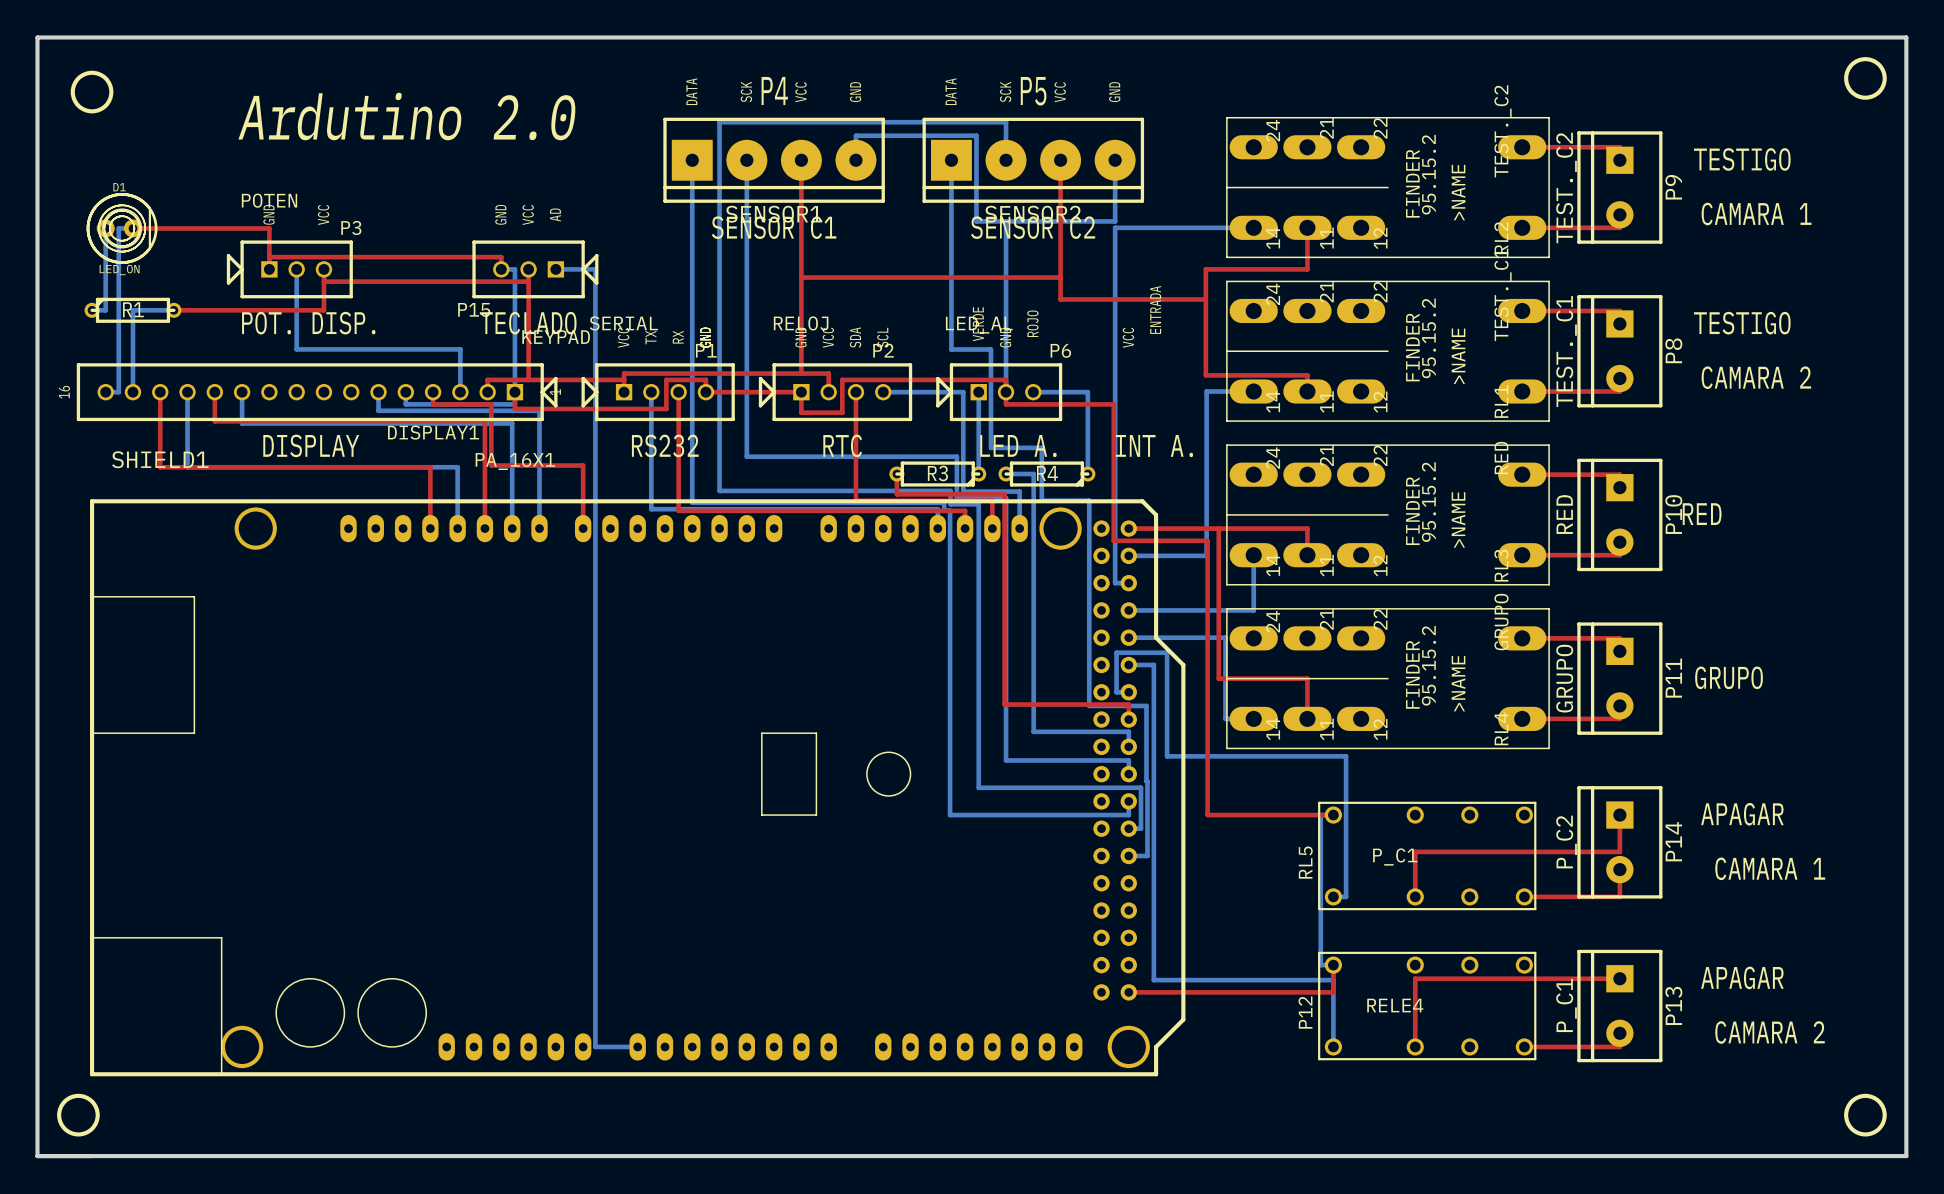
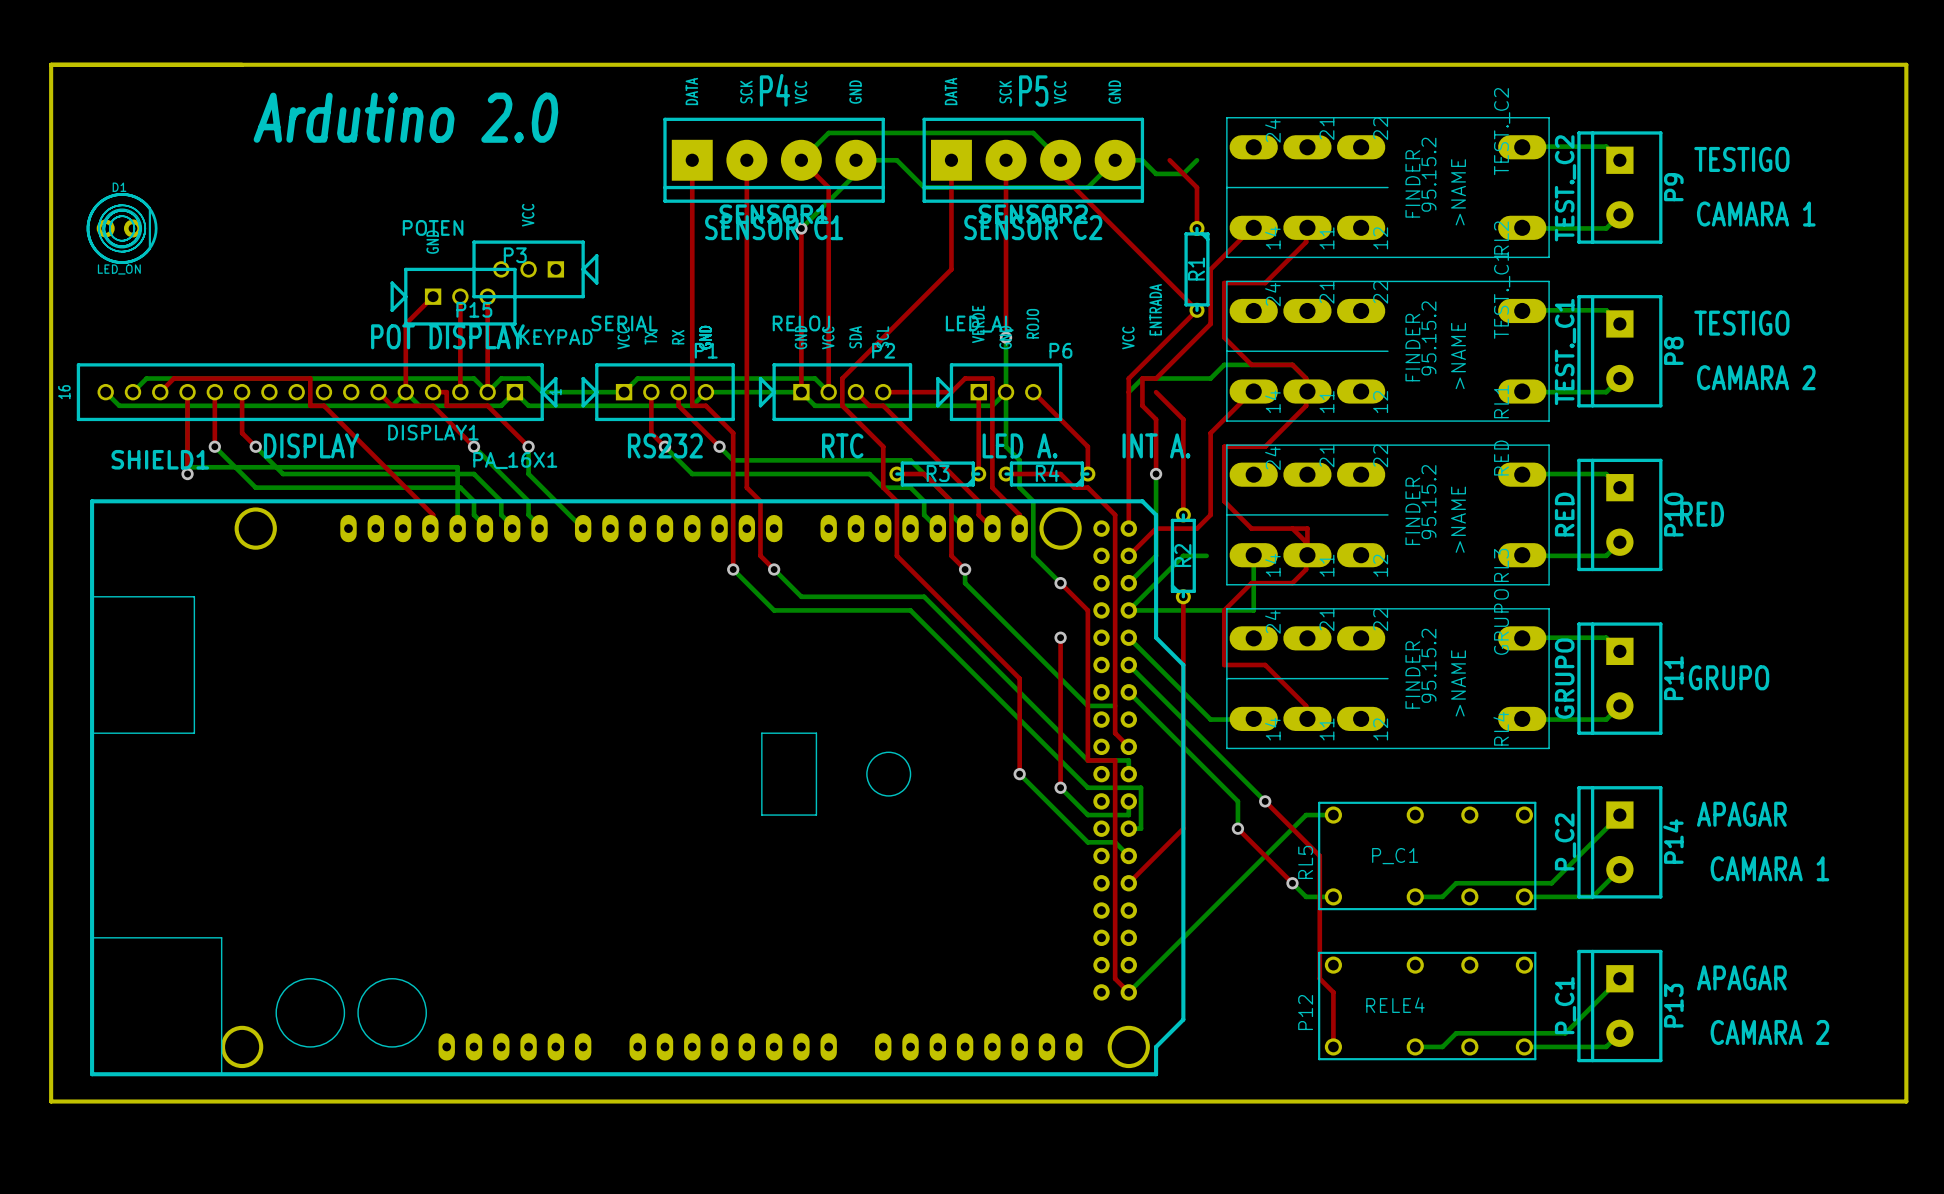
drawing: [1844, 57, 1887, 100] -> none
board edge: (1906, 64) (1906, 37) (37, 37) (37, 1156) (1906, 1156) (1906, 1101) -> (1906, 64) (51, 64) (51, 1101) (1906, 1101)
drawing: [70, 70, 114, 114] -> none
bottom track: none -> (1522, 147) (1606, 146) (1619, 160)
top track: (1522, 147) (1619, 147) (1619, 160) -> none
bottom track: (692, 160) (692, 502) (944, 502) (944, 510) (950, 510) (950, 815) (1087, 815) -> (1060, 787) (1087, 815)
top track: none -> (692, 160) (692, 405) (705, 405) (733, 433) (733, 569)
bottom track: (746, 160) (746, 456) (956, 456) (956, 497) (1006, 497) (1006, 760) (1087, 760) -> (774, 569) (801, 596) (924, 596) (1087, 760)
top track: none -> (746, 160) (746, 487) (760, 501) (760, 555) (774, 569)
bottom track: none -> (801, 160) (828, 132) (1033, 132) (1060, 160)
top track: (801, 160) (801, 228) -> (801, 160) (828, 187) (828, 373)
bottom track: (855, 160) (855, 135) (976, 135) (976, 221) (1115, 221) (1115, 160) -> none
bottom track: (951, 160) (951, 349) (990, 349) (990, 447) (1041, 447) (1041, 500) (1089, 500) (1089, 705) -> (965, 569) (965, 583) (1089, 705)
bottom track: (1006, 160) (1006, 122) (719, 122) (719, 490) (950, 490) (950, 504) (978, 504) (978, 787) (1087, 787) -> (733, 569) (774, 610) (910, 610) (1087, 787)
top track: none -> (1006, 160) (1006, 337)
top track: none -> (1169, 160) (1197, 187) (1197, 228)
bottom track: none -> (1197, 160) (1183, 173) (1156, 173) (1142, 160) (1115, 160) (1087, 187) (924, 187) (896, 160) (855, 160) (855, 173) (801, 228)
top track: (1060, 173) (1060, 299) (1205, 299) -> (1060, 173) (1197, 310) (1128, 378) (1128, 528)
text: GND (268, 214) -> none
text: VCC (323, 214) -> none
text position: GND (500, 214) -> GND (432, 242)
text: AD (555, 214) -> none
bottom track: none -> (1619, 214) (1606, 228) (1522, 227)
top track: (1619, 214) (1619, 227) (1522, 227) -> none
bottom track: (1006, 221) (1006, 337) -> none
bottom track: (1253, 227) (1115, 227) (1115, 583) (1128, 583) -> (1156, 474) (1156, 555) (1128, 583)
top track: none -> (1253, 227) (1210, 269) (1210, 323) (1156, 378) (1142, 378) (1142, 405) (1156, 419) (1156, 474)
top track: (1307, 227) (1307, 269) (1205, 269) (1205, 375) (1307, 375) (1307, 391) -> (1307, 227) (1306, 242) (1265, 283) (1224, 283) (1224, 337) (1251, 364) (1292, 364) (1306, 378) (1306, 405) (1265, 446) (1224, 446) (1224, 501) (1251, 528)
bottom track: (105, 228) (105, 310) (92, 310) -> none
bottom track: (132, 228) (118, 228) (118, 392) (105, 392) -> (1060, 583) (1033, 555) (1033, 501) (1019, 487) (1019, 460) (1006, 446) (1006, 392) (992, 405) (815, 405) (801, 392) (705, 392) (692, 405) (528, 405) (514, 392) (501, 405) (419, 405) (405, 392) (392, 405) (119, 405) (105, 392)
top track: (132, 228) (269, 228) (269, 269) -> none
via: none -> (801, 228)
top track: (269, 257) (501, 257) (501, 269) -> none
P3 position: (289, 269) -> (453, 296)
bottom track: (296, 269) (296, 349) (460, 349) (460, 392) -> none
top track: (323, 269) (323, 310) (173, 310) -> none
bottom track: (501, 269) (514, 269) (514, 404) (405, 404) (405, 392) -> none
top track: (528, 269) (528, 379) -> none
bottom track: (555, 269) (595, 269) (595, 1046) (637, 1046) -> none
top track: (801, 277) (1060, 277) -> none
top track: (323, 281) (528, 281) -> none
top track: none -> (433, 296) (405, 323) (405, 392)
top track: none -> (460, 296) (460, 392)
R1 rotation: 0° (132, 310) -> 90° clockwise (1197, 269)
R1 position: (132, 310) -> (1197, 269)
bottom track: (173, 310) (132, 310) (132, 392) -> (828, 392) (815, 378) (637, 378) (624, 392) (542, 392) (528, 378) (501, 378) (487, 392) (474, 378) (146, 378) (132, 392)
bottom track: none -> (1522, 310) (1606, 310) (1619, 323)
top track: (1522, 310) (1619, 310) (1619, 323) -> none
text: POT. DISP. (308, 323) -> POT DISPLAY (447, 336)
text: TECLADO (528, 323) -> none
via: none -> (1006, 337)
top track: none -> (801, 373) (801, 392)
top track: (828, 373) (624, 373) (624, 392) -> none
bottom track: none -> (1619, 378) (1606, 392) (1522, 391)
top track: (1619, 378) (1619, 391) (1522, 391) -> none
top track: (487, 379) (624, 379) -> (487, 379) (487, 296)
top track: (842, 379) (1006, 379) (1006, 404) (1113, 404) (1113, 540) (1207, 540) (1207, 815) (1333, 815) -> (842, 379) (951, 269) (951, 160)
bottom track: (1253, 391) (1206, 391) (1206, 555) -> none
bottom track: none -> (1307, 391) (1306, 378) (1292, 364) (1224, 364) (1210, 378) (1142, 378) (1128, 392)
top track: (160, 392) (160, 467) (430, 467) (430, 528) -> (160, 392) (173, 378) (310, 378) (310, 405) (323, 405) (433, 514) (433, 528) (430, 528)
top track: none -> (187, 392) (187, 474)
bottom track: (242, 392) (242, 423) (512, 423) (512, 528) -> (255, 446) (283, 474) (474, 474) (501, 501) (501, 514) (514, 528) (512, 528)
top track: none -> (242, 392) (242, 433) (255, 446)
bottom track: (378, 392) (378, 410) (539, 410) (539, 528) -> (474, 446) (528, 501) (528, 514) (542, 528) (539, 528)
top track: none -> (378, 392) (392, 405) (433, 405) (474, 446)
top track: (433, 392) (433, 404) (491, 404) (491, 465) (583, 465) (583, 528) -> (433, 392) (446, 392) (446, 405) (487, 405) (528, 446)
top track: (514, 392) (514, 408) (666, 408) (666, 379) (705, 379) (705, 392) (801, 392) (801, 412) (842, 412) (842, 405) -> (1019, 774) (1019, 678) (896, 555) (896, 501) (883, 487) (883, 446) (842, 405)
bottom track: (651, 392) (651, 509) (937, 509) (937, 528) -> (664, 446) (692, 474) (869, 474) (883, 487) (910, 487) (924, 501) (924, 514) (937, 528)
top track: none -> (651, 392) (651, 433) (664, 446)
top track: (855, 392) (855, 500) (992, 500) (992, 528) -> (855, 392) (869, 405) (883, 405) (978, 501) (978, 514) (992, 528)
bottom track: (883, 392) (963, 392) (963, 491) (1019, 491) (1019, 528) -> none
top track: none -> (883, 392) (951, 392) (965, 378) (992, 378) (992, 487) (1019, 514) (1019, 528)
bottom track: (978, 392) (978, 474) -> none
top track: none -> (978, 392) (978, 474)
bottom track: (1033, 392) (1087, 392) (1087, 474) -> none
top track: none -> (1033, 392) (1087, 446) (1087, 474)
top track: none -> (1156, 392) (1183, 419) (1183, 514)
top track: (678, 405) (678, 510) (965, 510) (965, 528) -> (678, 405) (719, 446)
top track: (214, 421) (484, 421) (484, 528) -> (214, 421) (214, 446)
bottom track: none -> (214, 446) (255, 487) (460, 487) (474, 501) (474, 514) (487, 528) (484, 528)
via: none -> (214, 446)
via: none -> (255, 446)
via: none -> (474, 446)
bottom track: none -> (528, 446) (528, 474) (583, 528)
via: none -> (528, 446)
via: none -> (664, 446)
bottom track: none -> (719, 446) (733, 460) (910, 460) (951, 501) (951, 514) (965, 528)
via: none -> (719, 446)
via: none -> (187, 474)
top track: (896, 474) (896, 494) (1004, 494) (1004, 704) (1128, 704) (1128, 719) -> (896, 474) (924, 474) (951, 501) (951, 555) (965, 569)
bottom track: (1006, 474) (1033, 474) (1033, 731) (1128, 731) (1128, 746) -> none
top track: none -> (1006, 474) (1060, 474) (1074, 487) (1087, 487) (1115, 514) (1115, 733) (1128, 746)
via: none -> (1156, 474)
bottom track: none -> (1522, 474) (1606, 474) (1619, 487)
top track: (1522, 474) (1619, 474) (1619, 487) -> none
top track: (1128, 528) (1156, 528) -> (1128, 555) (1156, 528)
top track: (1197, 528) (1251, 528) -> (1197, 528) (1210, 514) (1210, 433) (1253, 391)
top track: (1218, 528) (1218, 678) (1307, 678) (1307, 718) -> (1292, 528) (1306, 542) (1306, 569) (1292, 583) (1251, 583) (1224, 610) (1224, 664) (1265, 664) (1306, 705) (1307, 718)
bottom track: none -> (1619, 542) (1606, 555) (1522, 555)
top track: (1619, 542) (1619, 555) (1522, 555) -> none
bottom track: (1128, 555) (1183, 555) -> (1128, 610) (1183, 555)
R2: none -> (1183, 555)
via: none -> (733, 569)
via: none -> (774, 569)
via: none -> (965, 569)
via: none -> (1060, 583)
top track: none -> (1183, 596) (1183, 828) (1128, 883)
top track: none -> (1060, 637) (1060, 787)
via: none -> (1060, 637)
bottom track: (1128, 637) (1225, 637) (1225, 718) (1253, 718) -> (1128, 637) (1210, 719) (1253, 718)
bottom track: none -> (1522, 638) (1606, 637) (1619, 651)
top track: (1522, 638) (1619, 638) (1619, 651) -> none
bottom track: (1128, 664) (1153, 664) (1153, 980) (1333, 980) (1333, 1046) -> (1128, 664) (1265, 801)
bottom track: (1128, 692) (1116, 692) (1116, 652) (1167, 652) (1167, 756) (1346, 756) (1346, 896) (1333, 896) -> (1128, 692) (1237, 801) (1237, 828)
bottom track: (1115, 705) (1146, 705) (1147, 855) (1128, 855) -> (1019, 774) (1087, 842) (1115, 842) (1128, 855)
bottom track: none -> (1619, 705) (1606, 719) (1522, 718)
top track: (1619, 705) (1619, 718) (1522, 718) -> none
via: none -> (1019, 774)
via: none -> (1060, 787)
top track: none -> (1265, 801) (1319, 855) (1319, 978) (1333, 992) (1333, 1046)
via: none -> (1265, 801)
bottom track: (1320, 815) (1320, 965) (1333, 965) -> (1320, 815) (1306, 815) (1128, 992)
bottom track: none -> (1619, 815) (1551, 883) (1456, 883) (1442, 896) (1415, 896)
top track: (1619, 815) (1619, 851) (1415, 851) (1415, 896) -> none
top track: none -> (1237, 828) (1292, 883)
via: none -> (1237, 828)
bottom track: none -> (1619, 869) (1592, 896) (1524, 896)
top track: (1619, 869) (1619, 896) (1524, 896) -> none
bottom track: none -> (1292, 883) (1306, 896) (1333, 896)
via: none -> (1292, 883)
top track: (1333, 965) (1333, 992) (1128, 992) -> (1060, 583) (1087, 610) (1087, 760) (1115, 760) (1115, 978) (1128, 992)
bottom track: none -> (1619, 978) (1565, 1033) (1456, 1033) (1442, 1046) (1415, 1046)
top track: (1619, 978) (1415, 978) (1415, 1046) -> none
bottom track: none -> (1619, 1033) (1606, 1046) (1524, 1046)
top track: (1619, 1033) (1619, 1046) (1524, 1046) -> none
drawing: [57, 1093, 100, 1137] -> none
drawing: [1844, 1093, 1887, 1137] -> none

